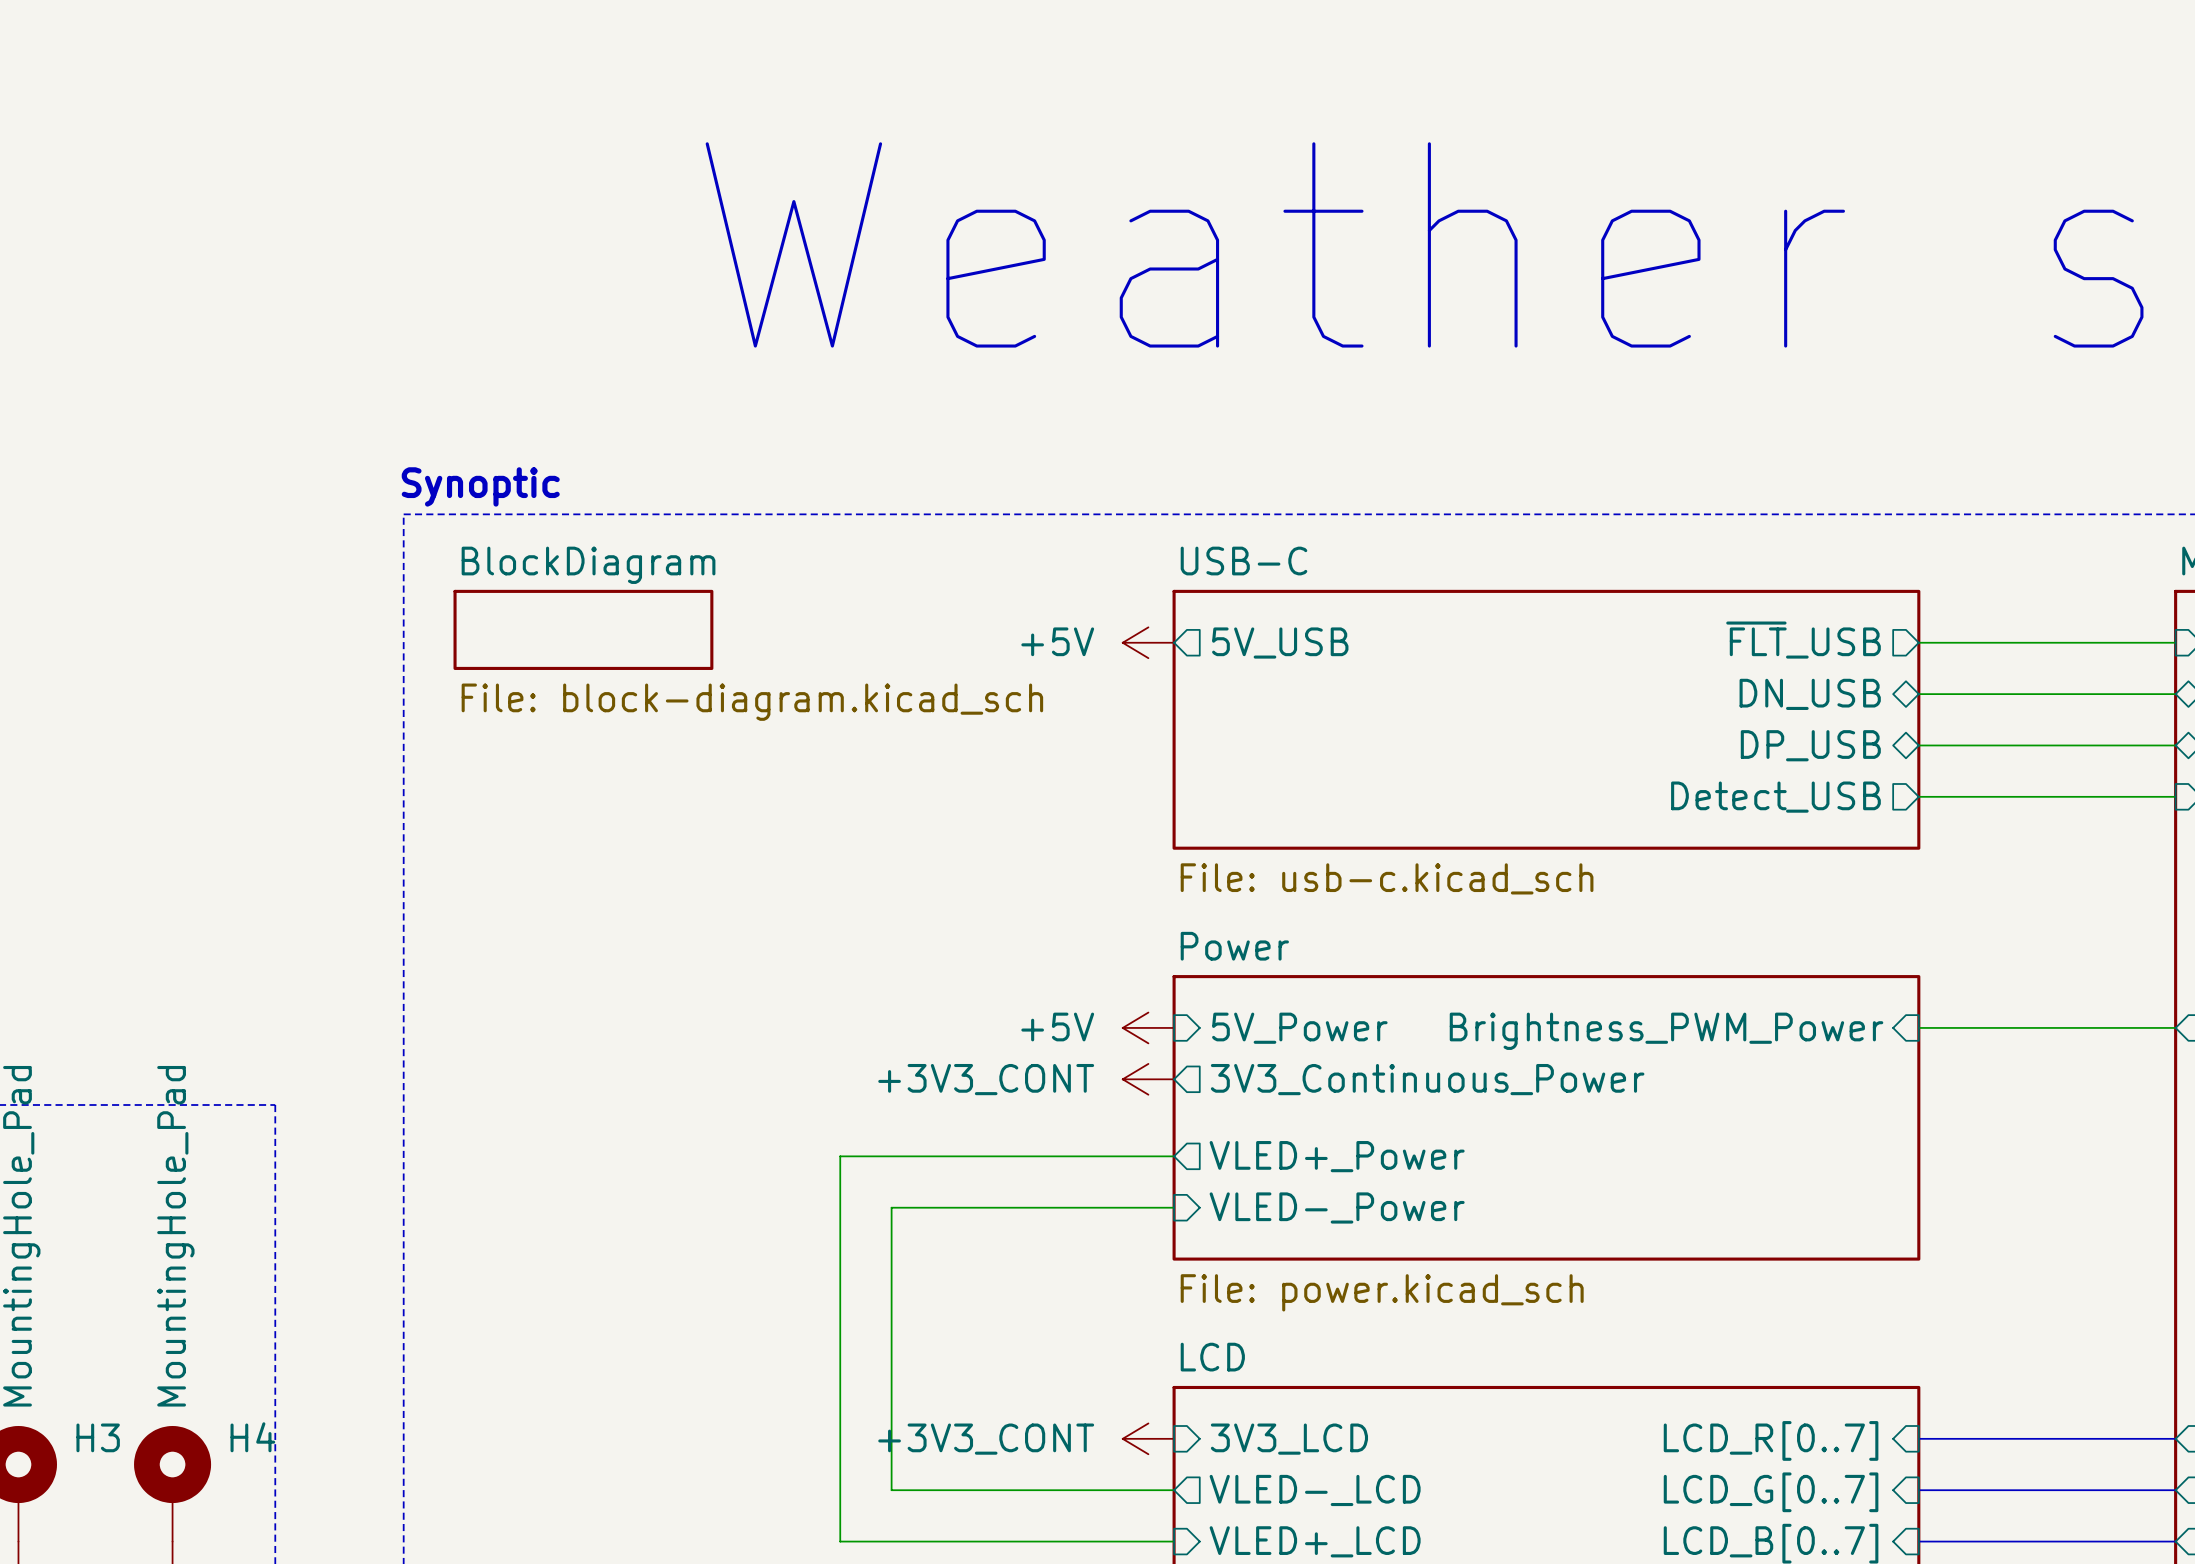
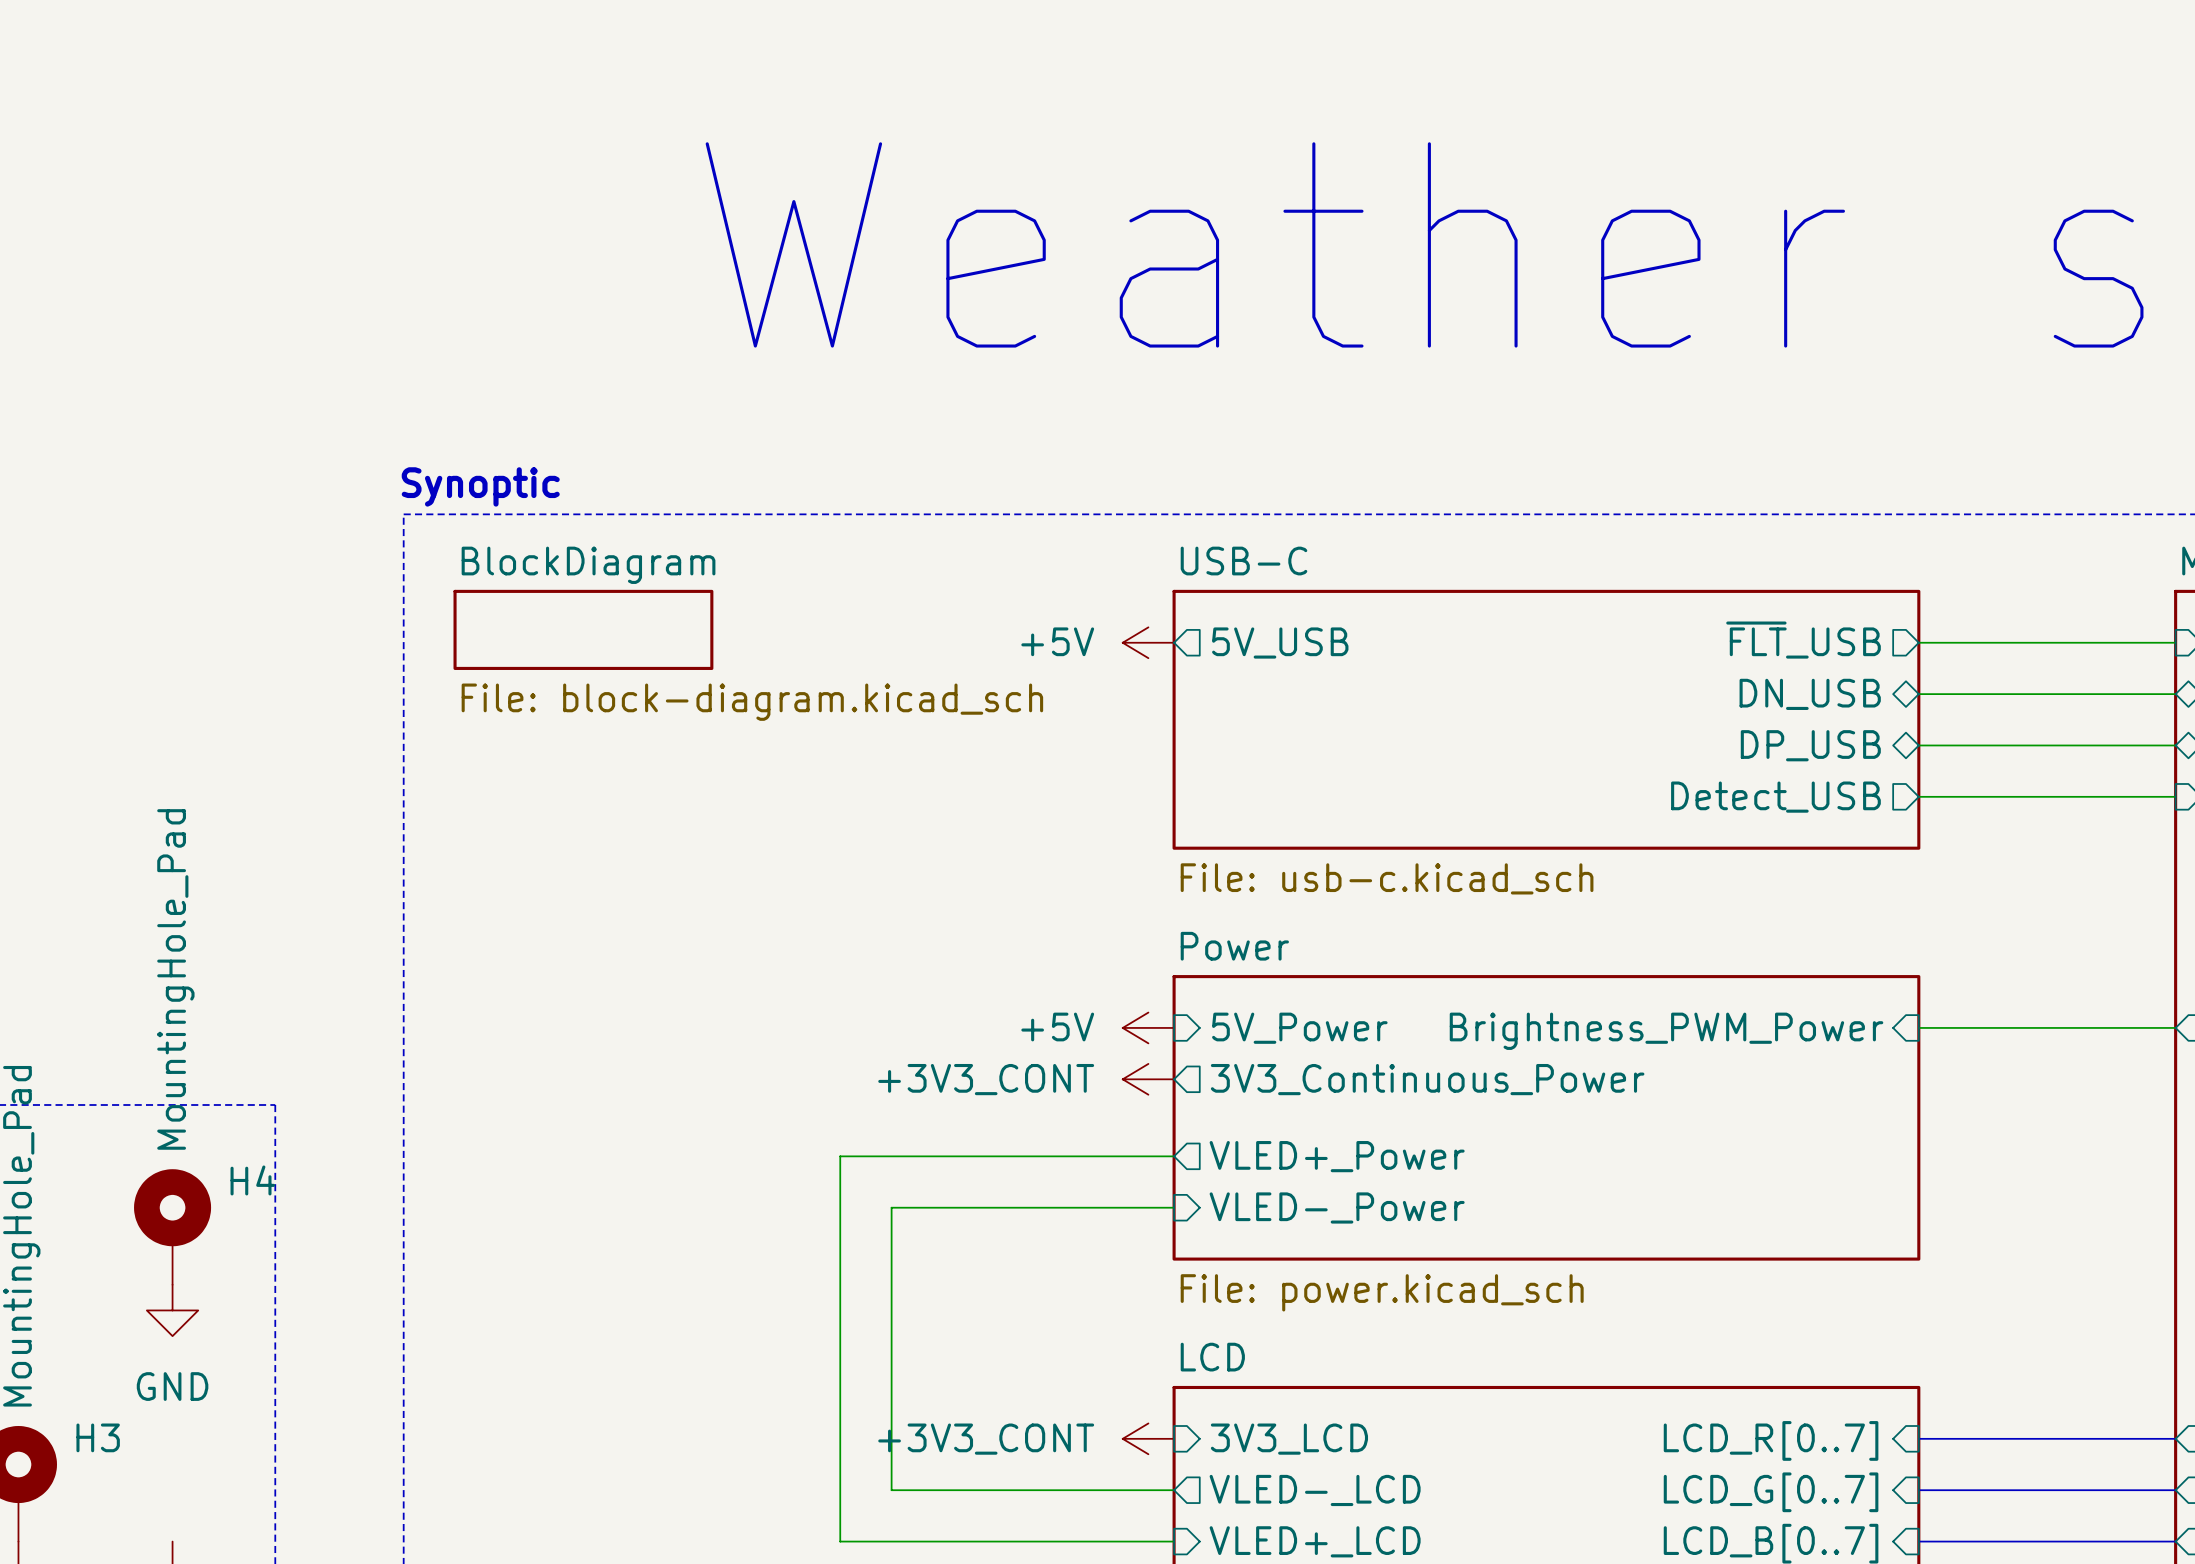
power symbol: none -> GND (172, 1310)
H4 position: (172, 1483) -> (172, 1226)

